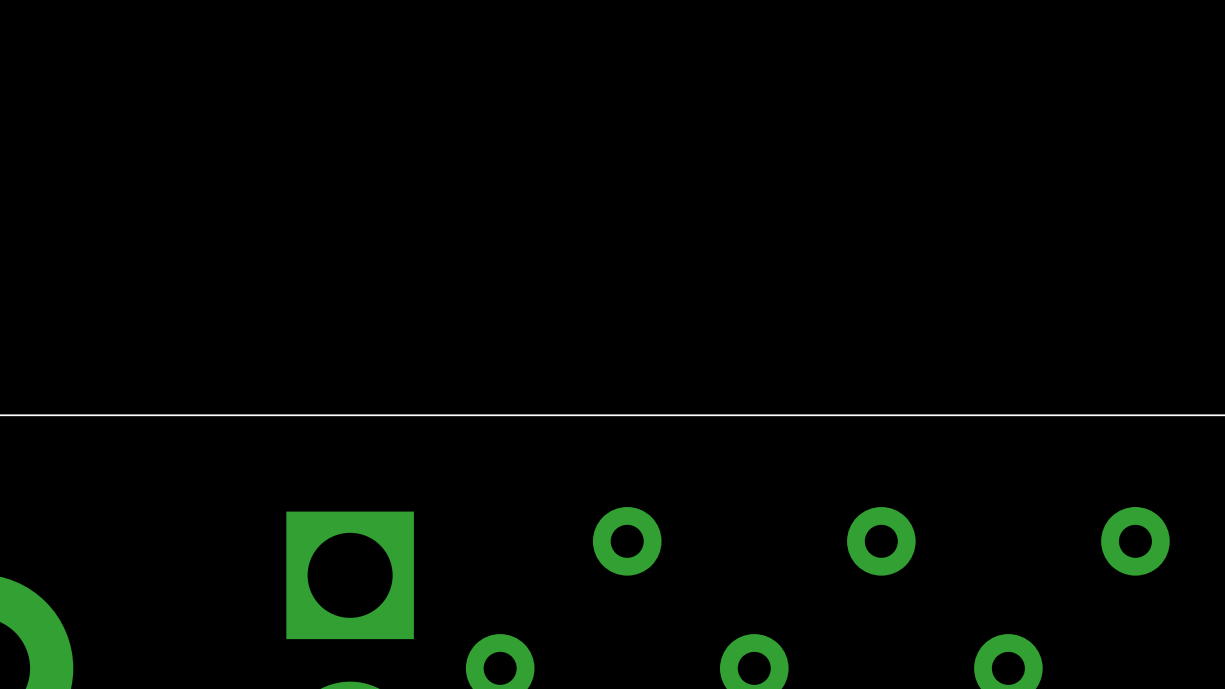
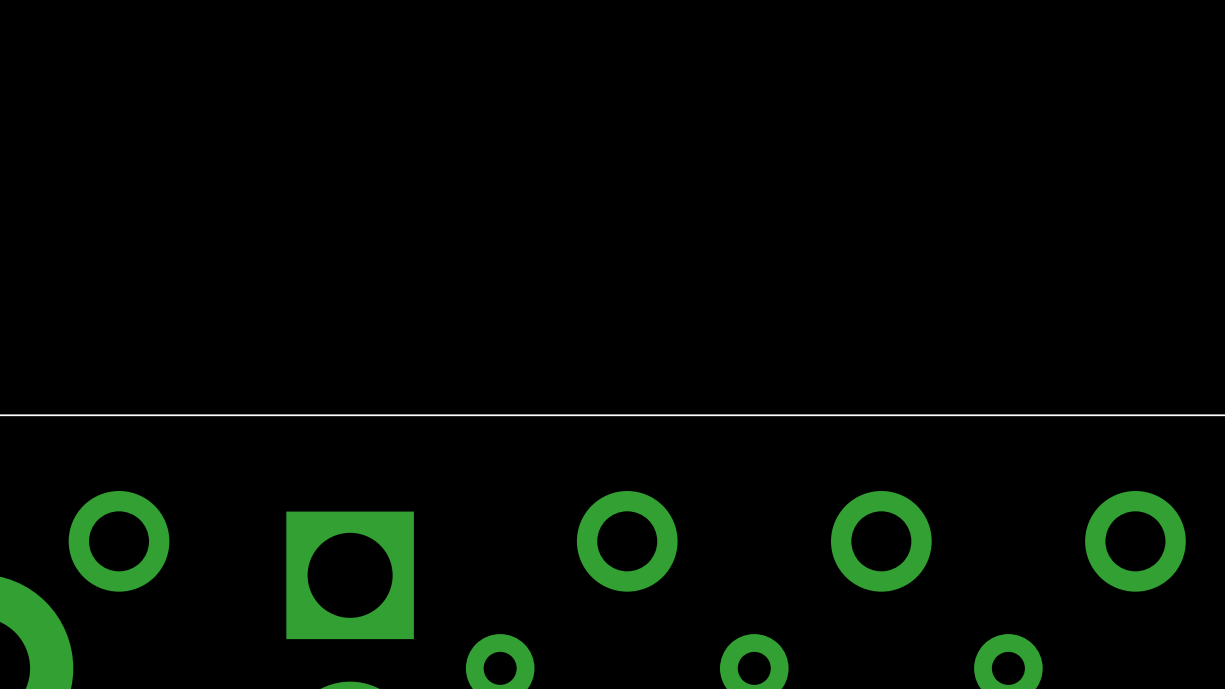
via size: [592, 507, 662, 576] -> [576, 490, 678, 592]
via size: [847, 507, 916, 576] -> [830, 490, 932, 592]
via size: [1101, 507, 1170, 576] -> [1085, 490, 1186, 592]
via: none -> (119, 541)

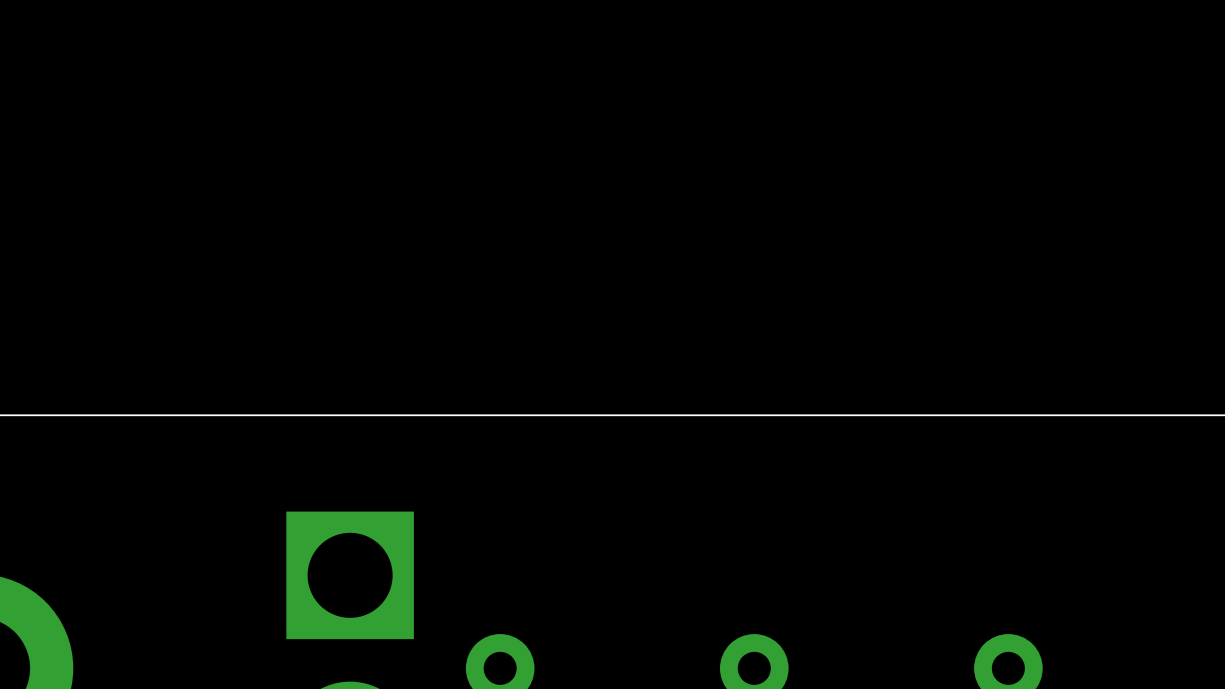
via: (119, 541) -> none
via: (627, 541) -> none
via: (881, 541) -> none
via: (1135, 541) -> none

